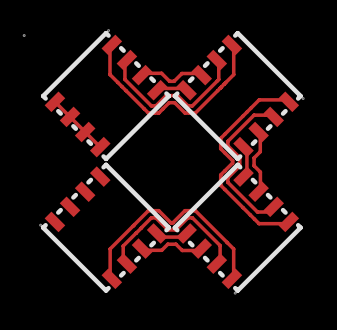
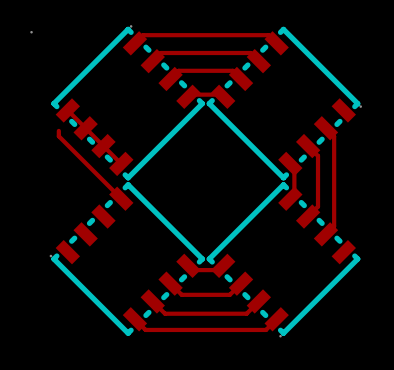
track: (111, 44) (109, 46) (109, 74) (148, 113) (158, 113) (169, 102) (174, 102) (184, 113) (195, 113) (233, 74) (233, 46) (231, 44) -> (134, 43) (143, 35) (268, 35) (276, 43)
track: (126, 60) (124, 62) (124, 79) (151, 105) (155, 105) (166, 95) (177, 95) (187, 105) (192, 105) (218, 79) (218, 61) (216, 60) -> (152, 61) (160, 52) (250, 52) (258, 61)
track: (200, 73) (181, 73) (174, 81) (169, 81) (161, 73) (140, 73) (142, 75) -> (239, 77) (232, 70) (178, 70) (170, 78)
track: (288, 101) (286, 99) (259, 99) (220, 138) (220, 148) (232, 160) (220, 174) (220, 185) (259, 223) (281, 223) -> none
track: (265, 115) (254, 115) (227, 141) (227, 145) (239, 157) (239, 165) (227, 177) (227, 182) (257, 212) (268, 212) (273, 206) -> (325, 128) (334, 136) (334, 226) (325, 234)
track: none -> (58, 130) (58, 136) (121, 198)
track: (260, 133) (260, 151) (254, 157) (254, 165) (260, 172) (260, 189) -> (310, 148) (318, 155) (318, 206) (310, 214)
track: (142, 248) (140, 250) (161, 250) (167, 244) (175, 244) (182, 250) (199, 250) -> (170, 283) (181, 294) (229, 294) (238, 285)
track: (126, 263) (123, 259) (123, 246) (151, 217) (155, 217) (167, 229) (175, 229) (187, 217) (192, 217) (220, 245) (220, 259) (216, 263) -> (152, 301) (165, 313) (246, 313) (258, 301)
track: (111, 278) (110, 277) (110, 248) (148, 210) (158, 210) (170, 222) (184, 210) (195, 210) (233, 249) (234, 275) (231, 278) -> (134, 319) (145, 329) (266, 329) (276, 319)

